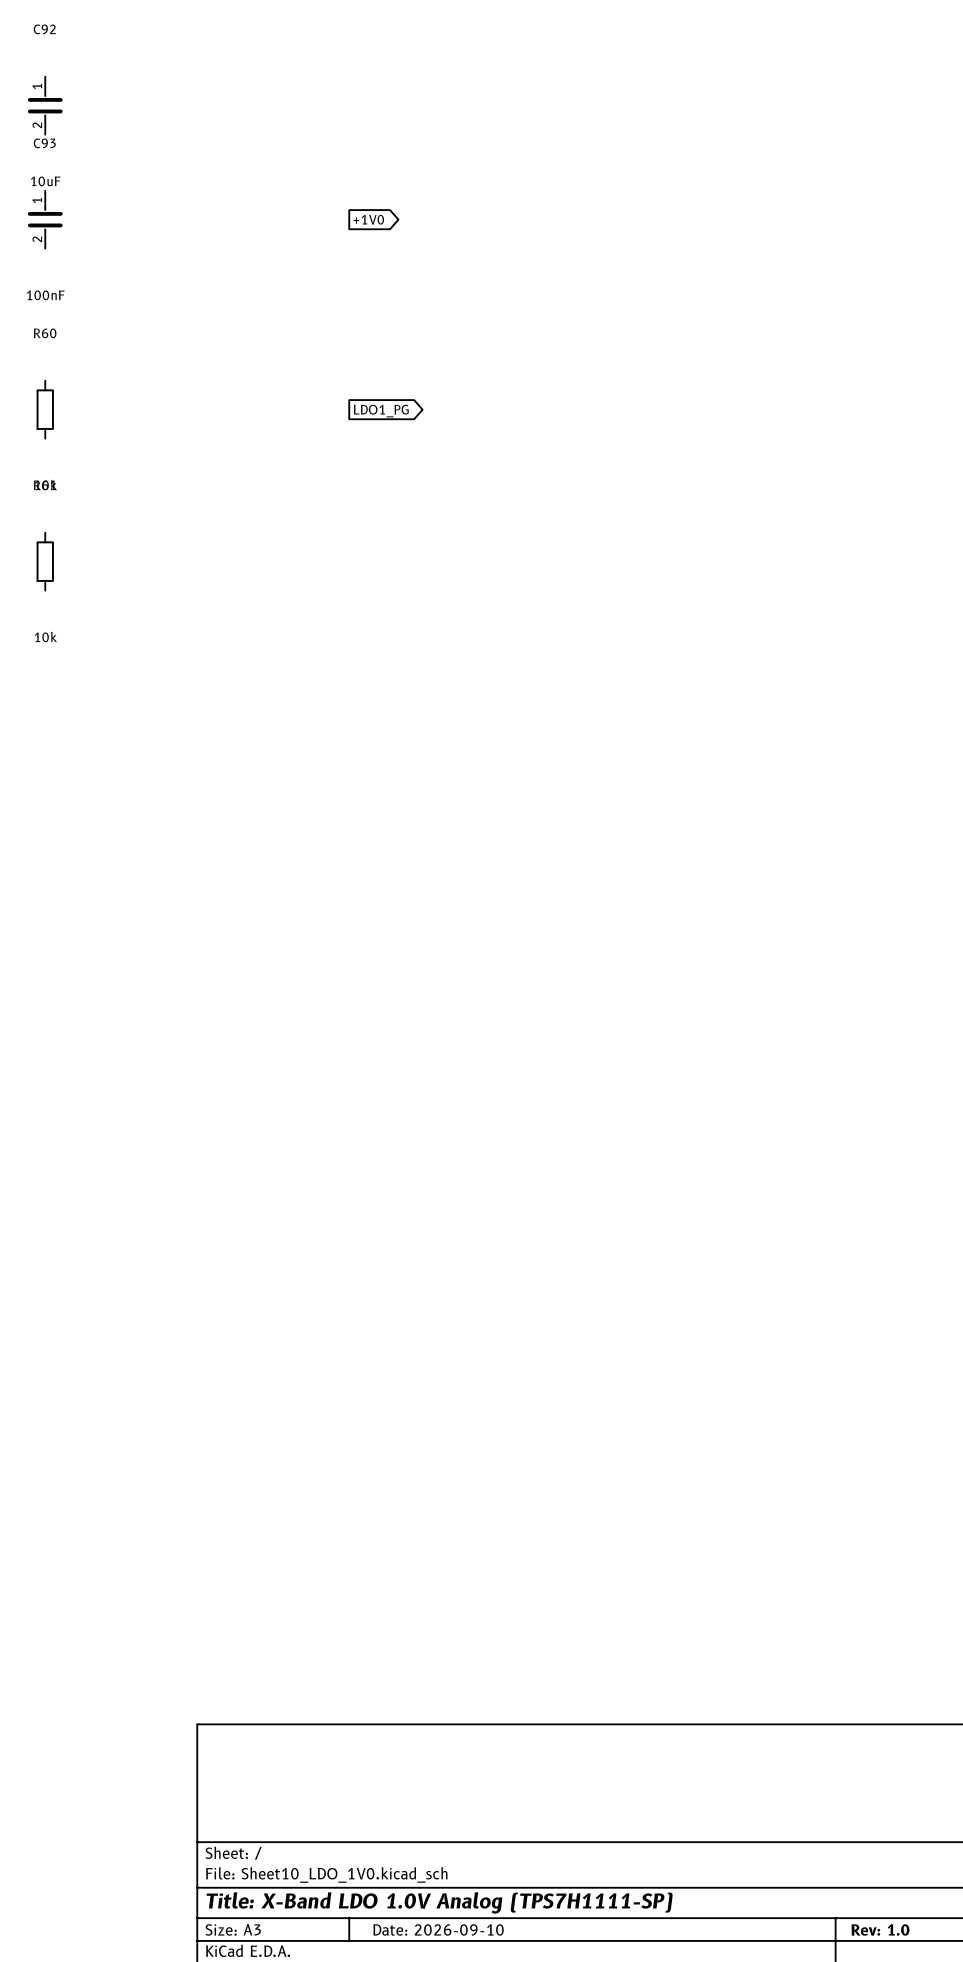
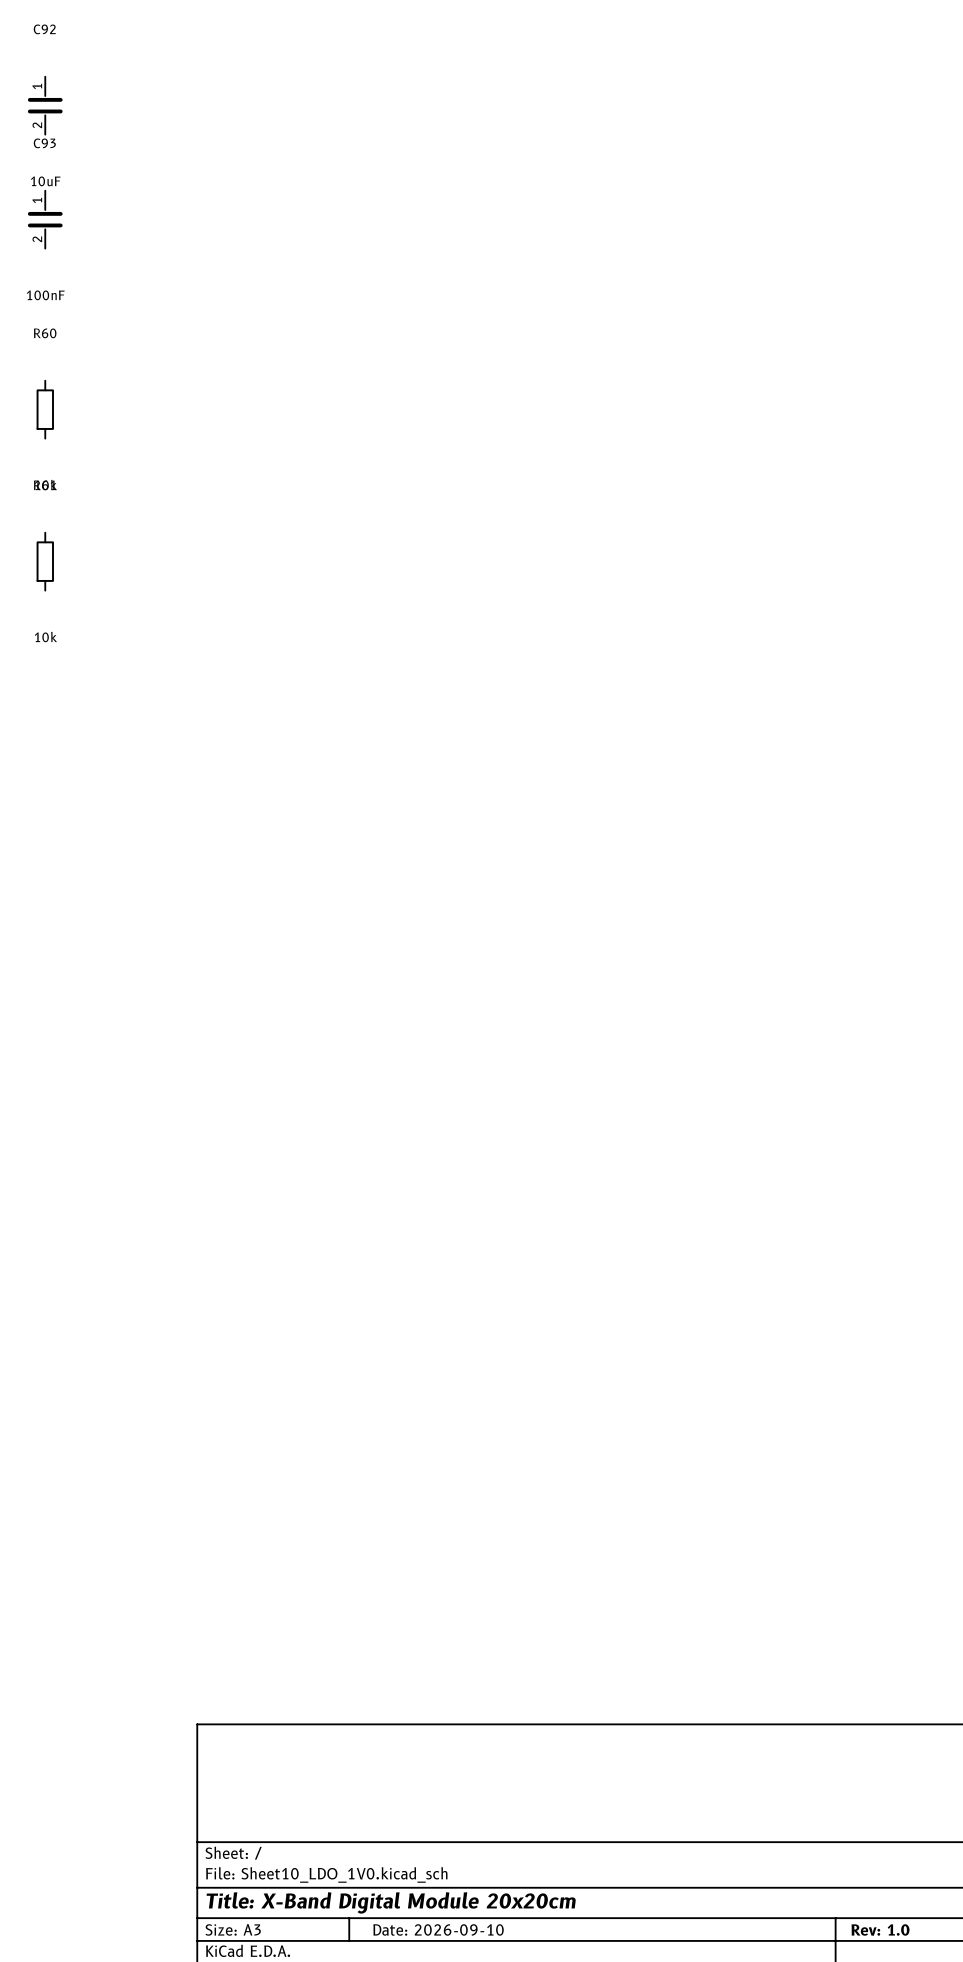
global label: +1V0 (368, 219) -> none
global label: LDO1_PG (381, 411) -> none
title block: Title: X-Band LDO 1.0V Analog (TPS7H1111-SP) (439, 1902) -> Title: X-Band Digital Module 20x20cm (391, 1902)

